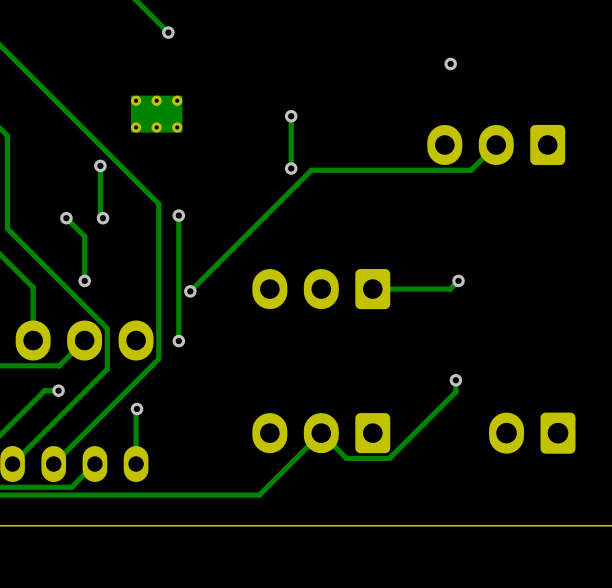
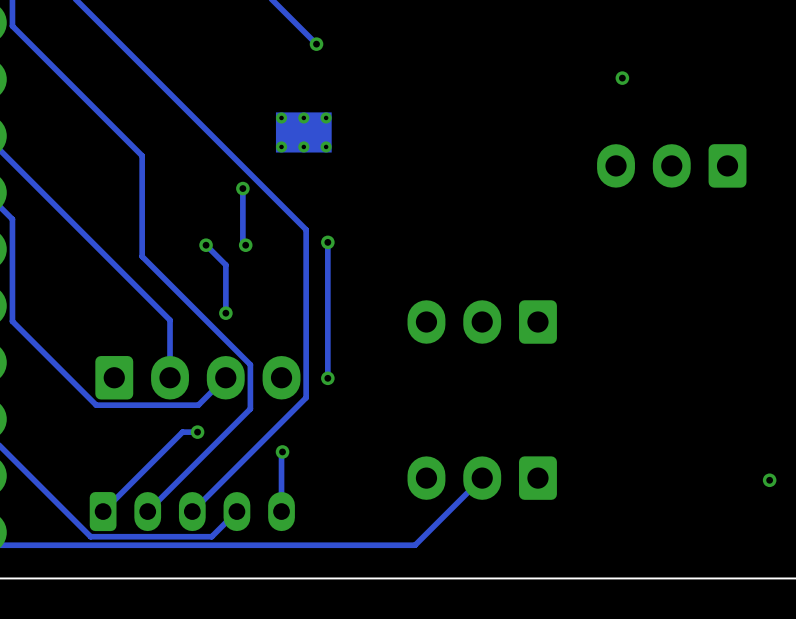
track: (291, 116) (291, 168) -> none
via: (291, 116) -> none
track: (496, 144) (470, 170) (311, 170) (190, 291) -> none
via: (291, 168) -> none
track: (458, 280) (450, 289) (372, 289) -> none
via: (458, 280) -> none
via: (190, 291) -> none
track: (455, 380) (455, 391) (389, 458) (346, 458) (321, 433) -> none
via: (455, 380) -> none
part: (532, 433) -> none
via: none -> (769, 480)

